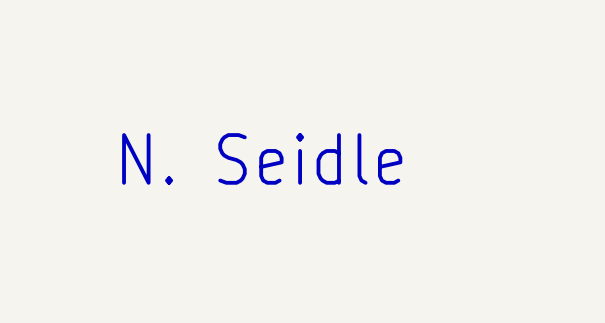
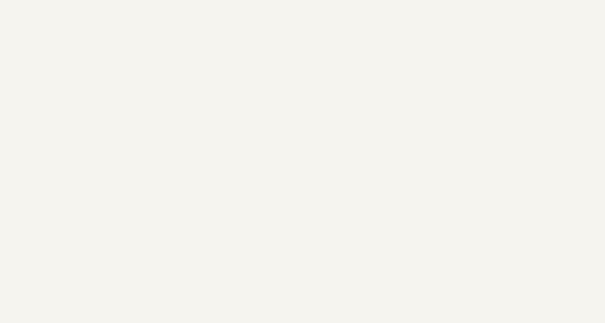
text: N. Seidle (262, 158) -> none

